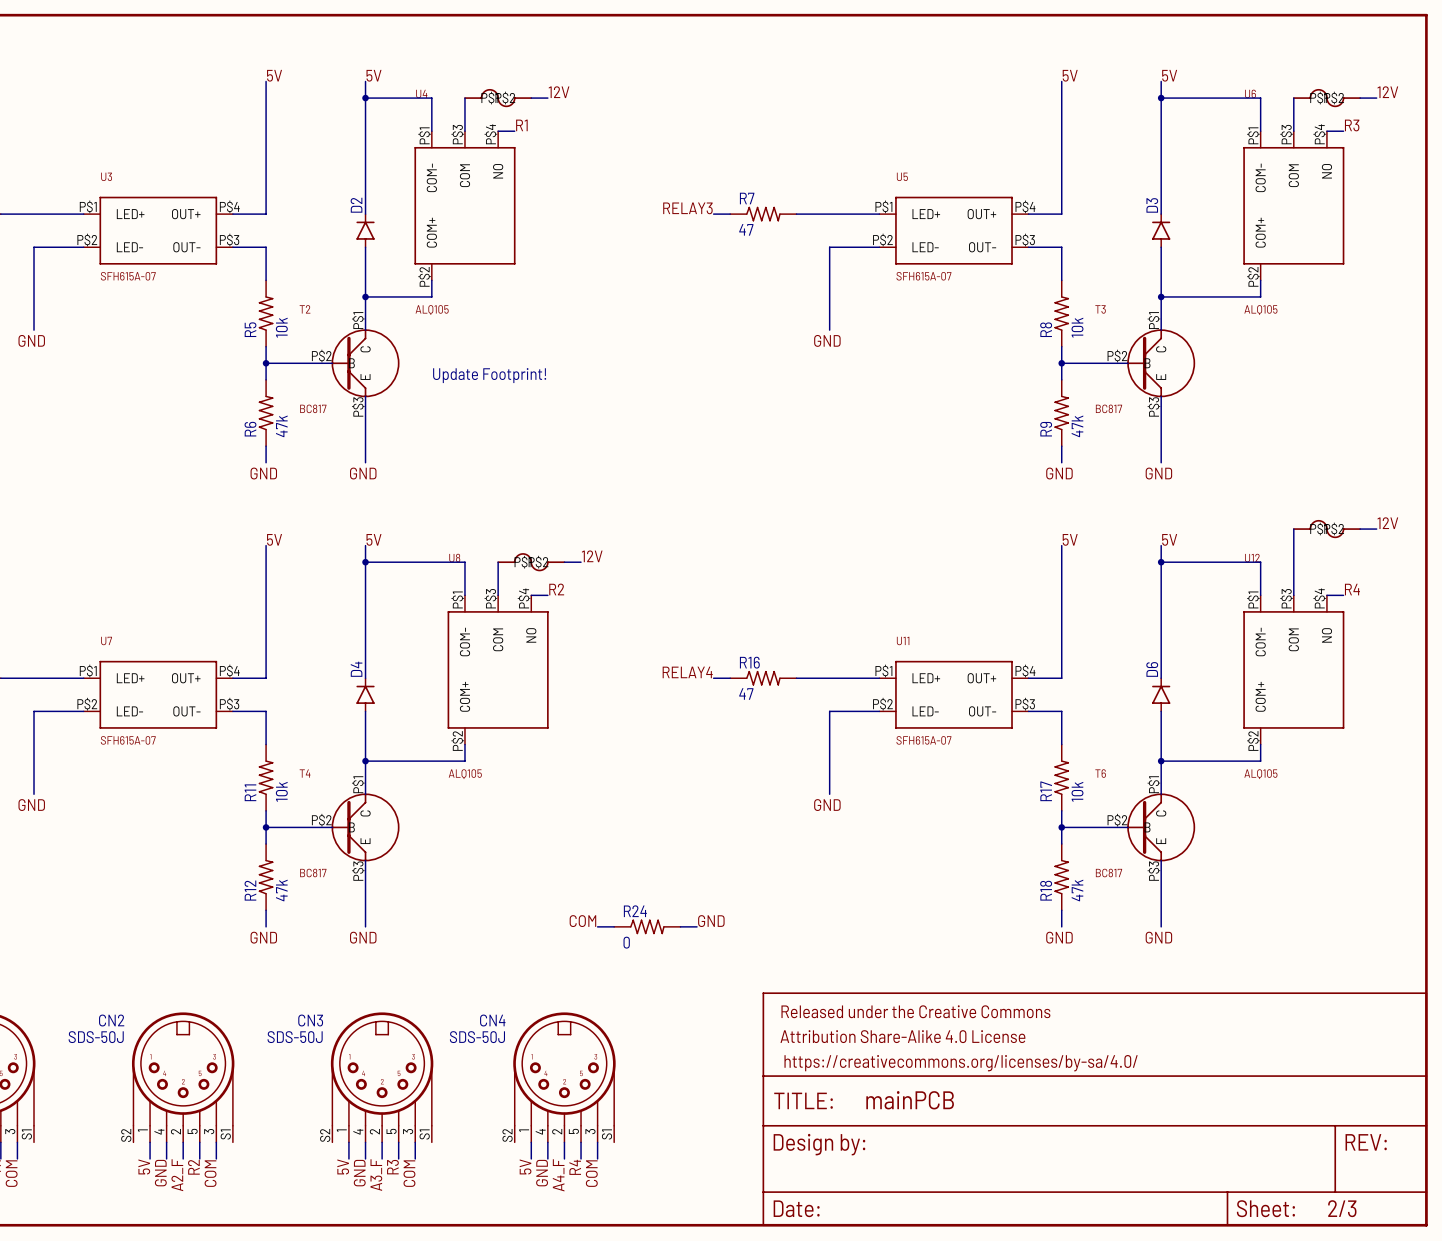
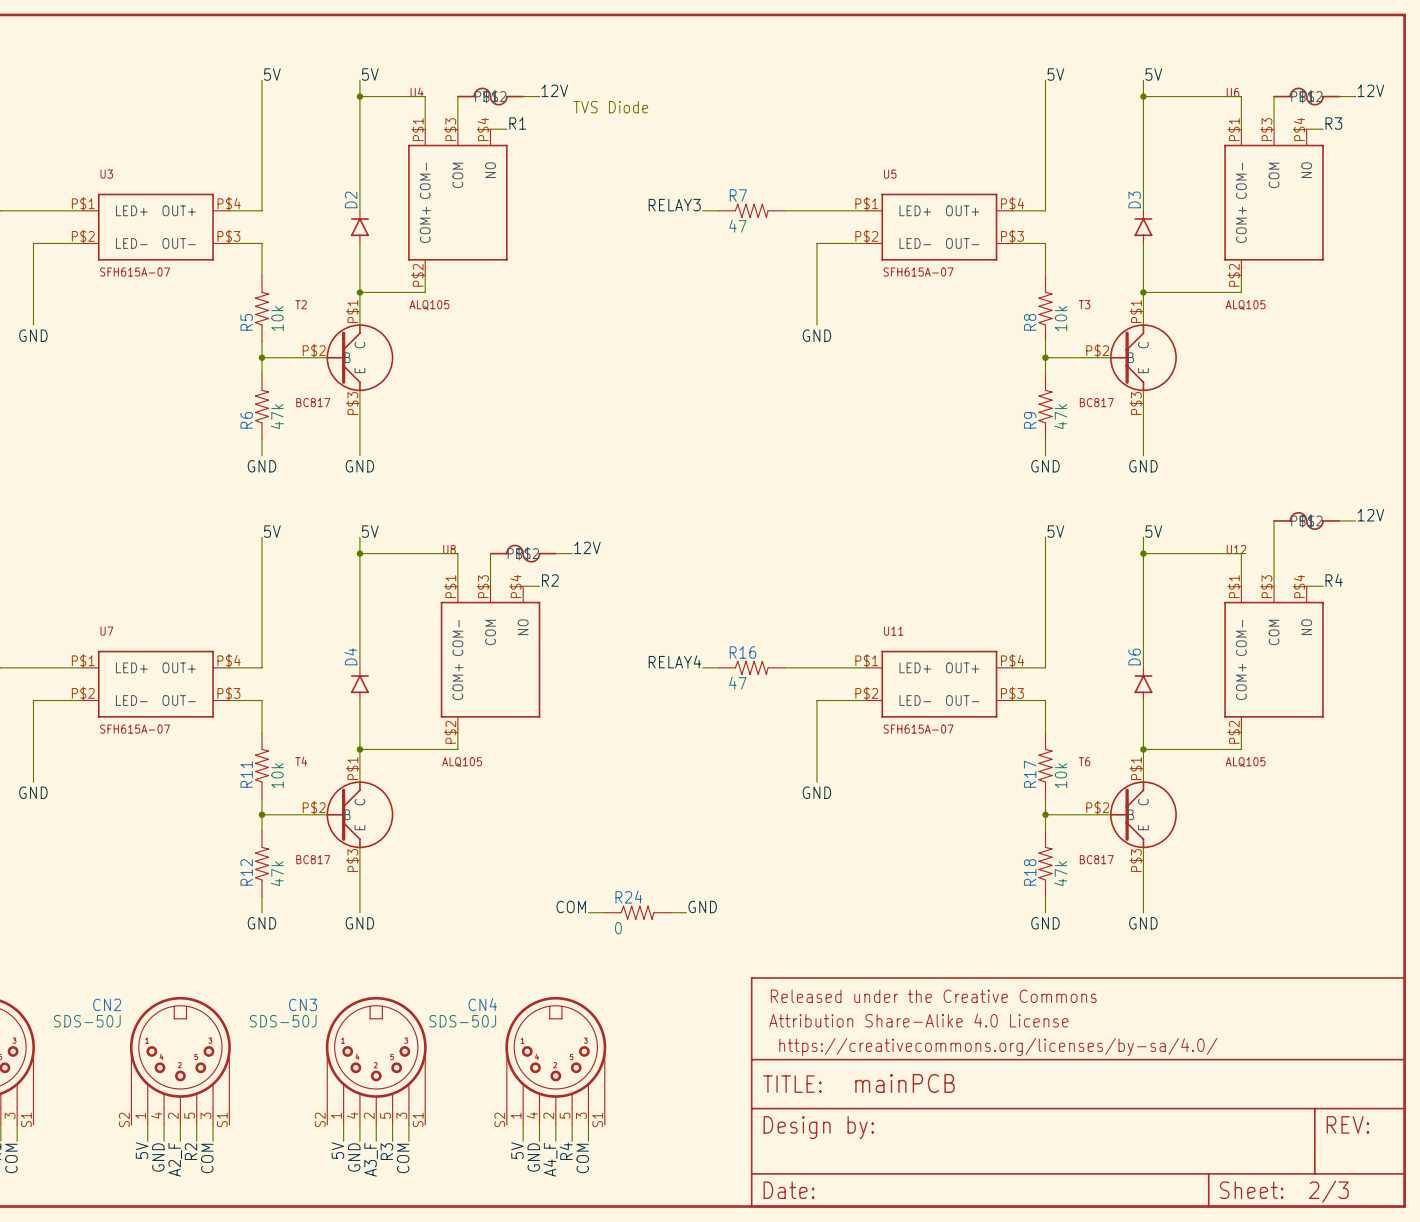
text: none -> TVS Diode (610, 107)
text: Update Footprint! (489, 375) -> none

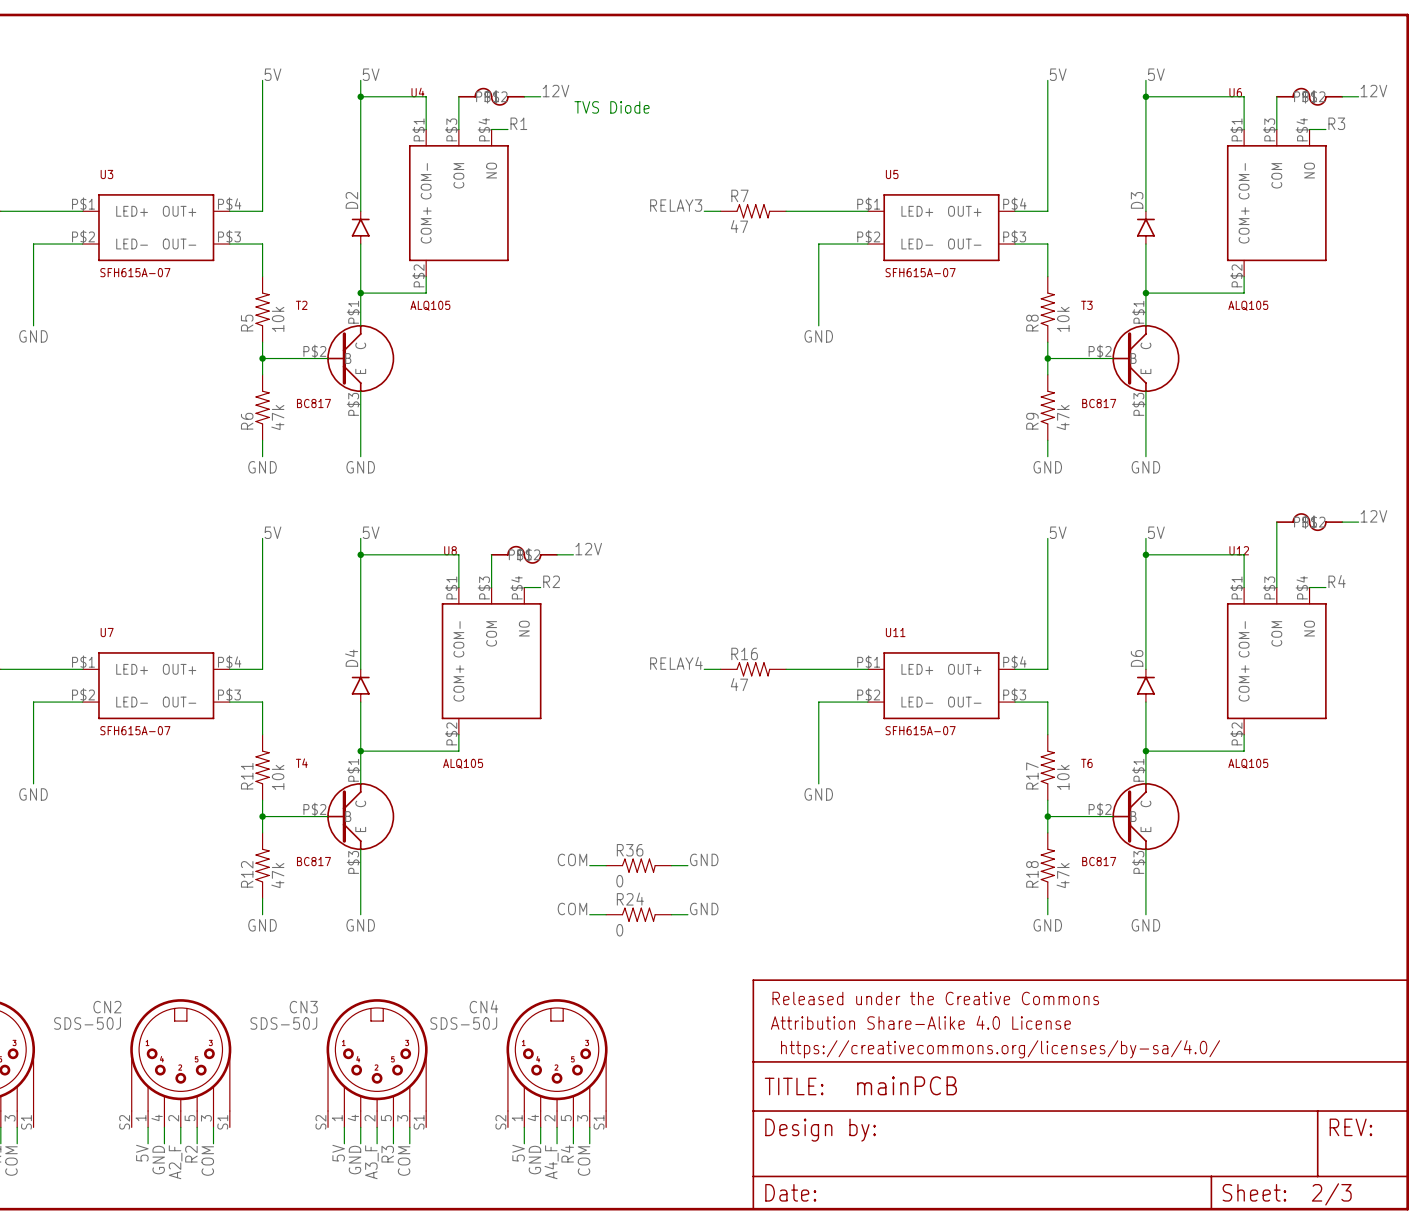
label: none -> COM (572, 859)
label: none -> GND (704, 859)
wire: none -> (589, 865) (606, 865)
R36: none -> 0 (638, 865)
wire: none -> (671, 865) (687, 865)

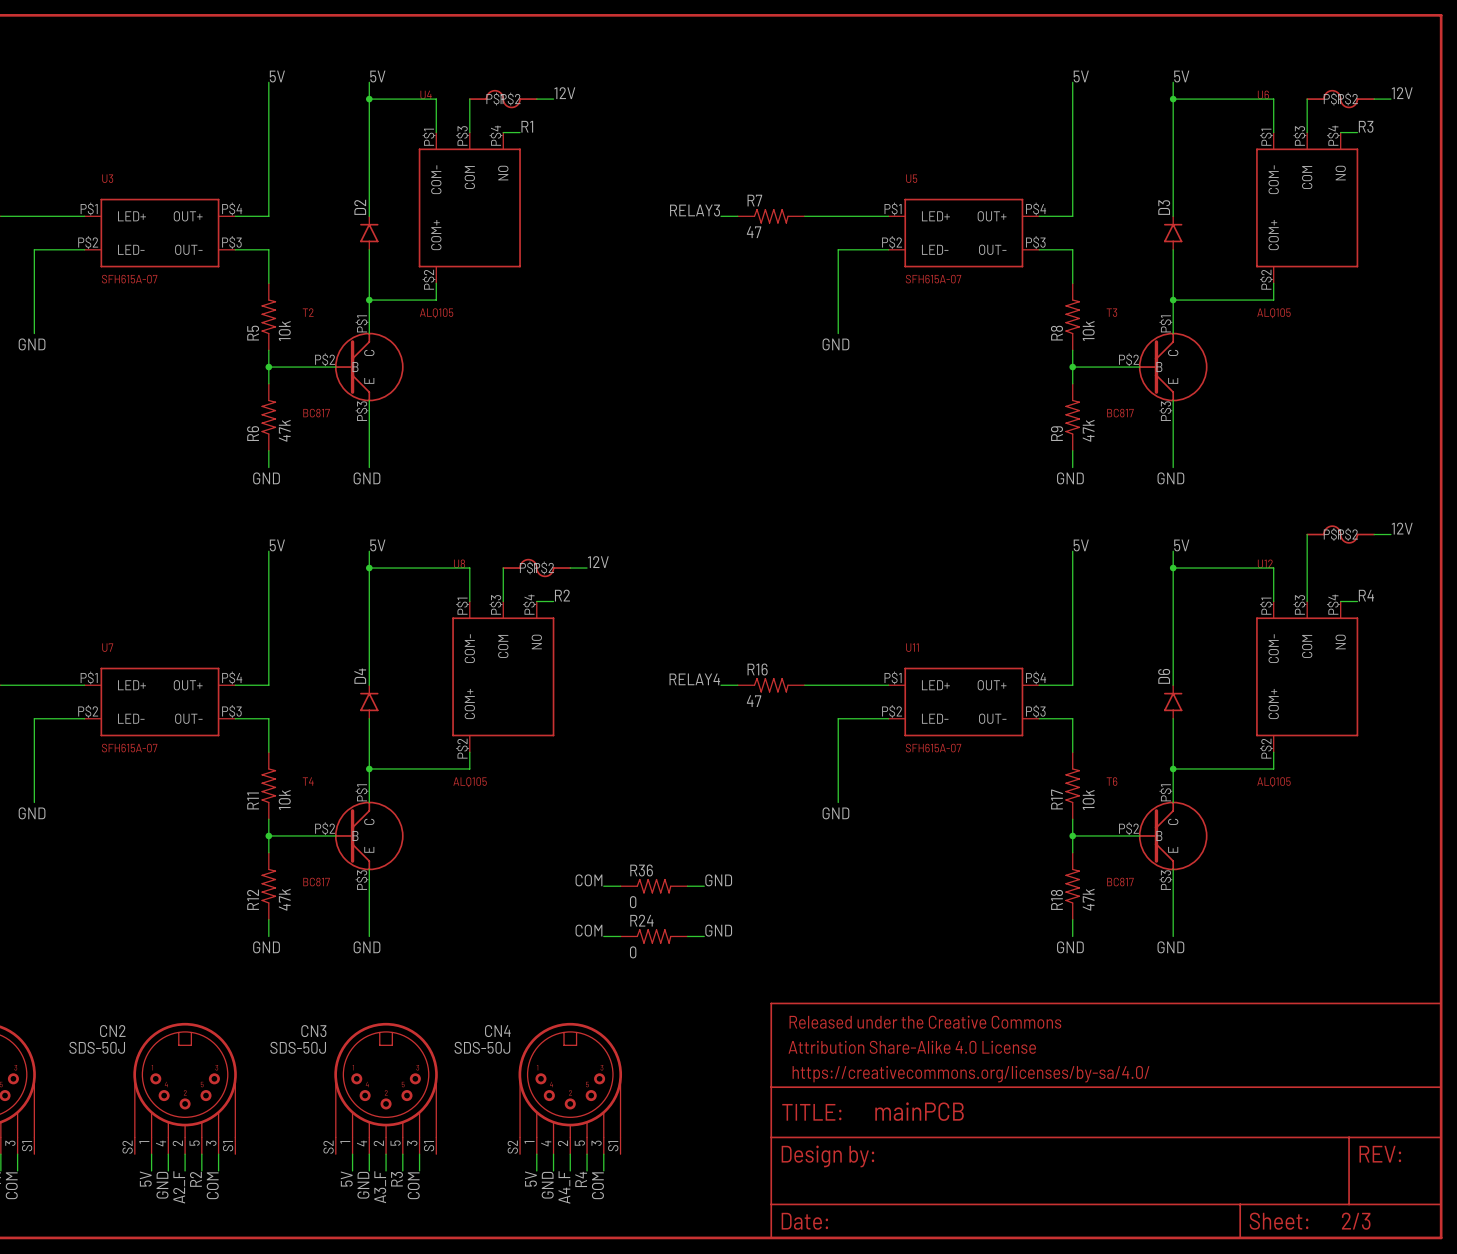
text: TVS Diode (612, 107) -> none

